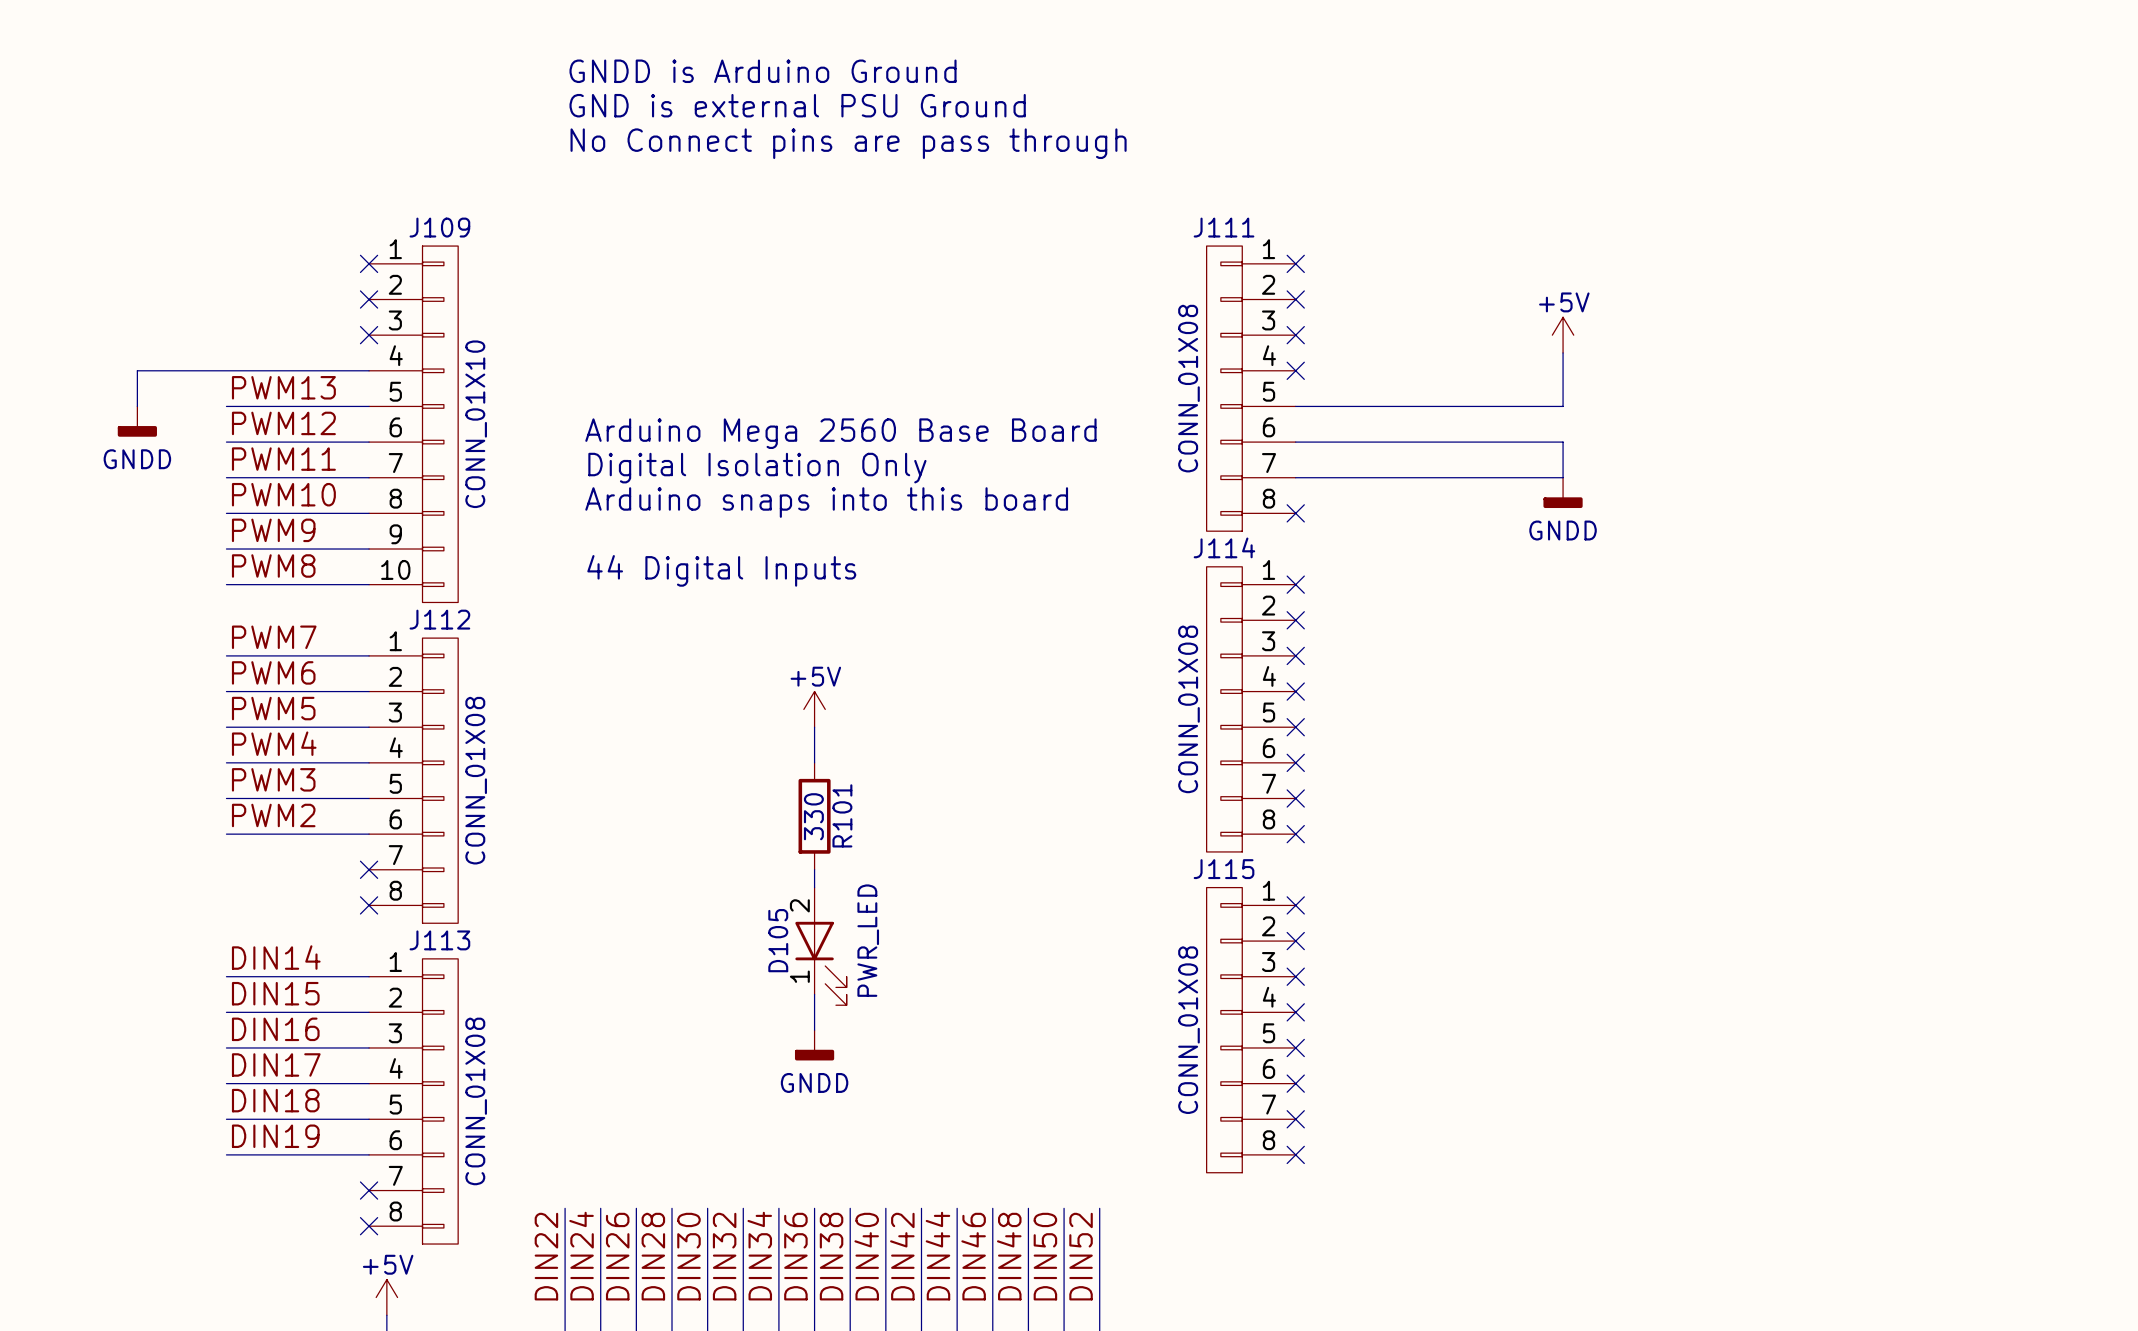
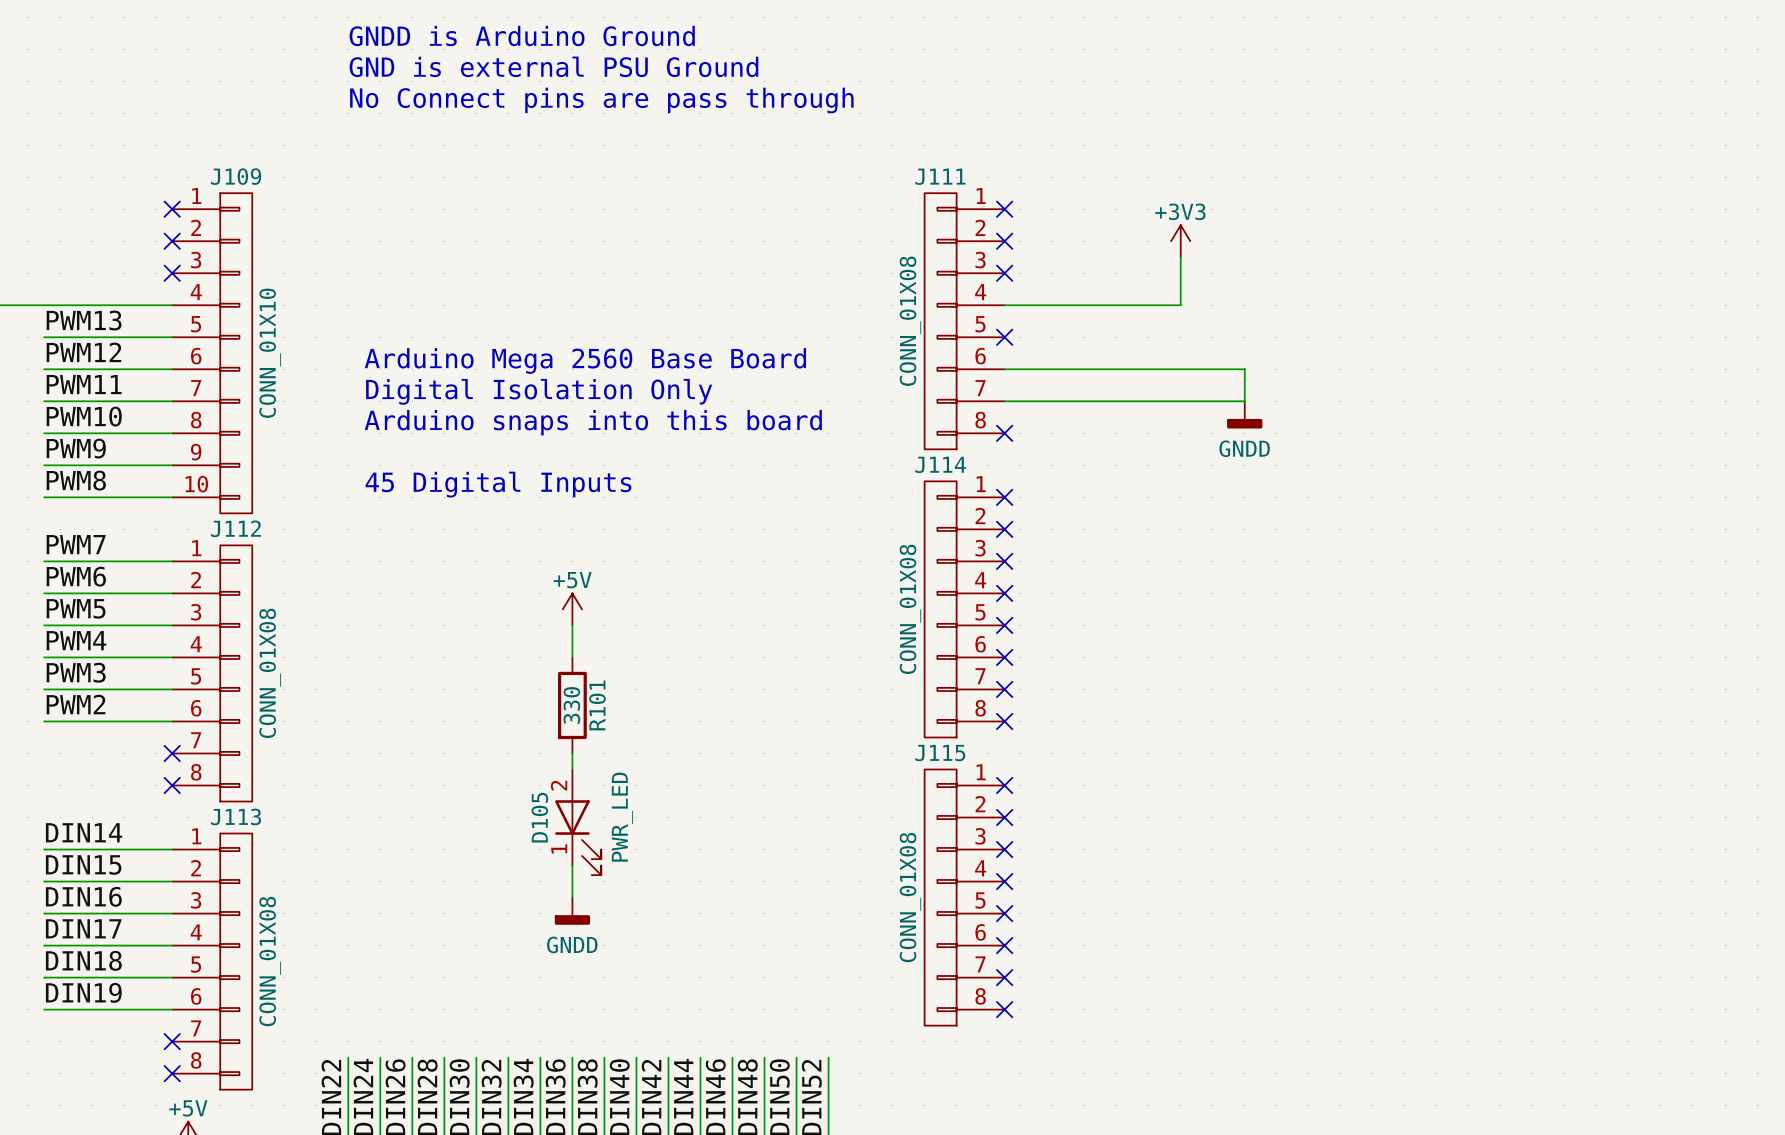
power symbol: none -> +3V3 (1180, 241)
wire: none -> (1180, 257) (1180, 305) (1004, 305)
power symbol: +5V (1563, 335) -> none
wire: (1563, 352) (1563, 406) (1295, 406) -> none
no-connect mark position: (1295, 370) -> (1004, 337)
text: 44 Digital Inputs (721, 570) -> 45 Digital Inputs (498, 484)

